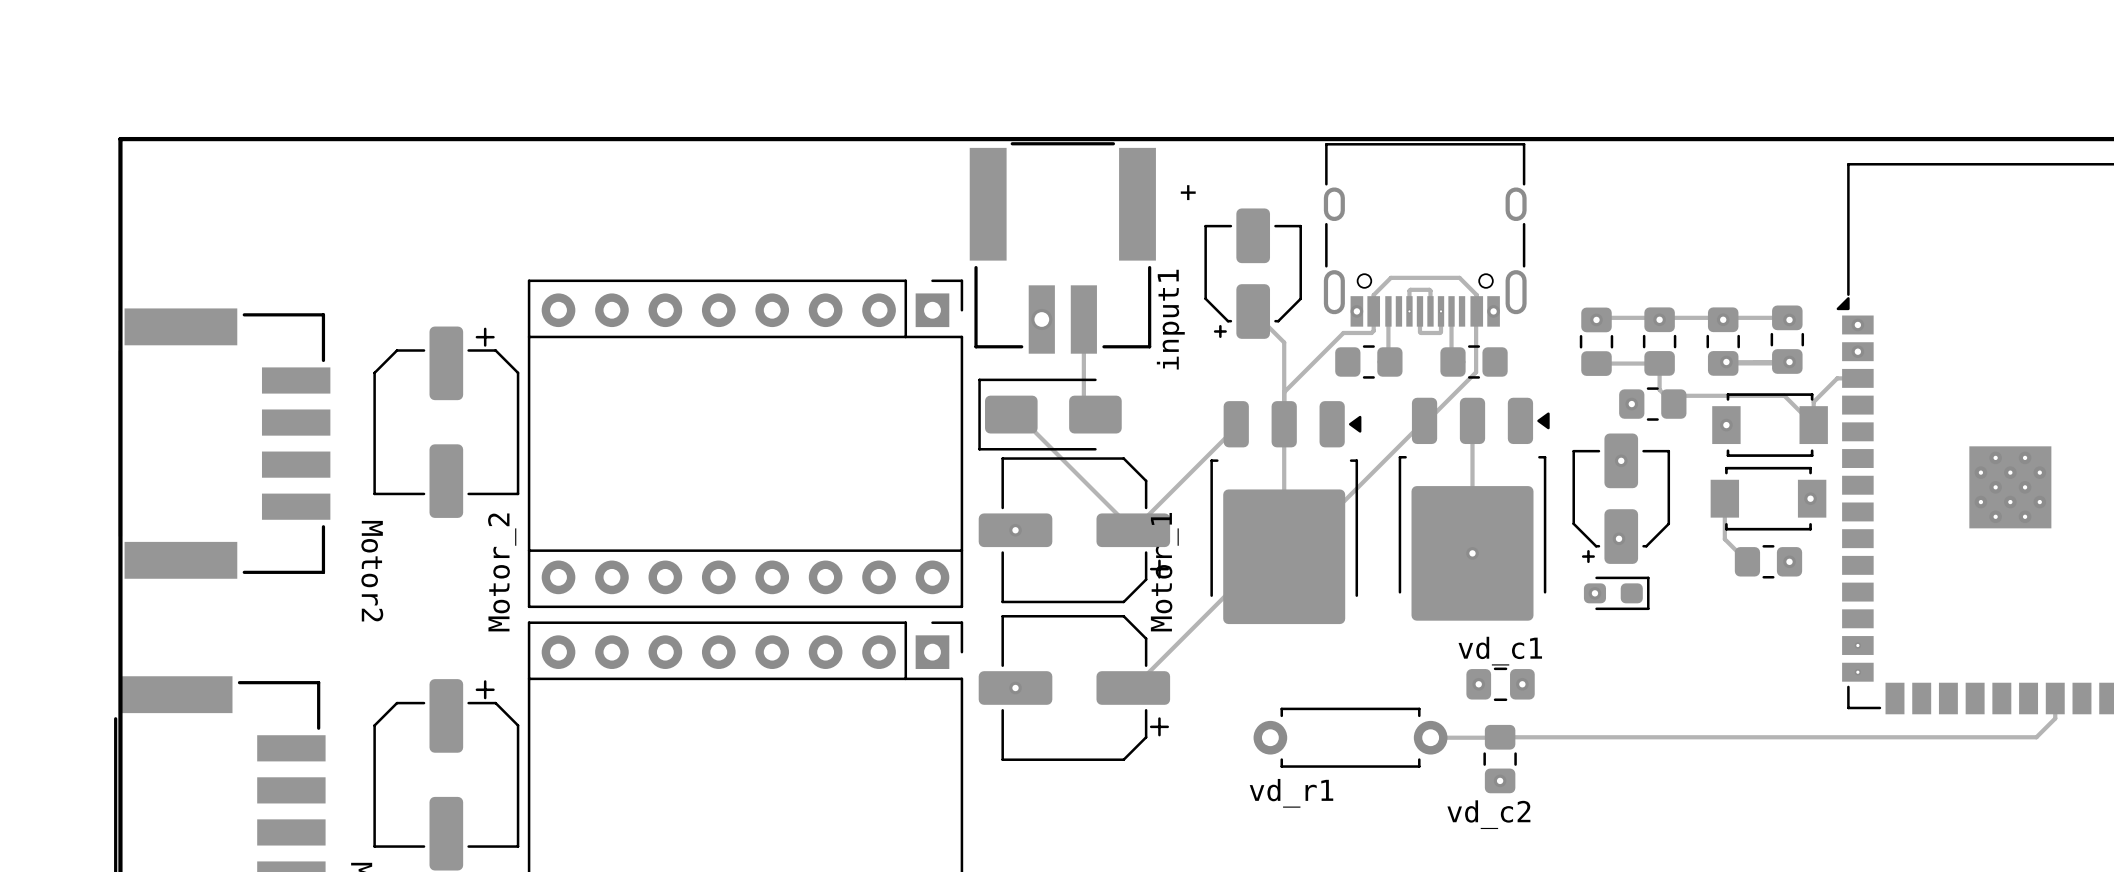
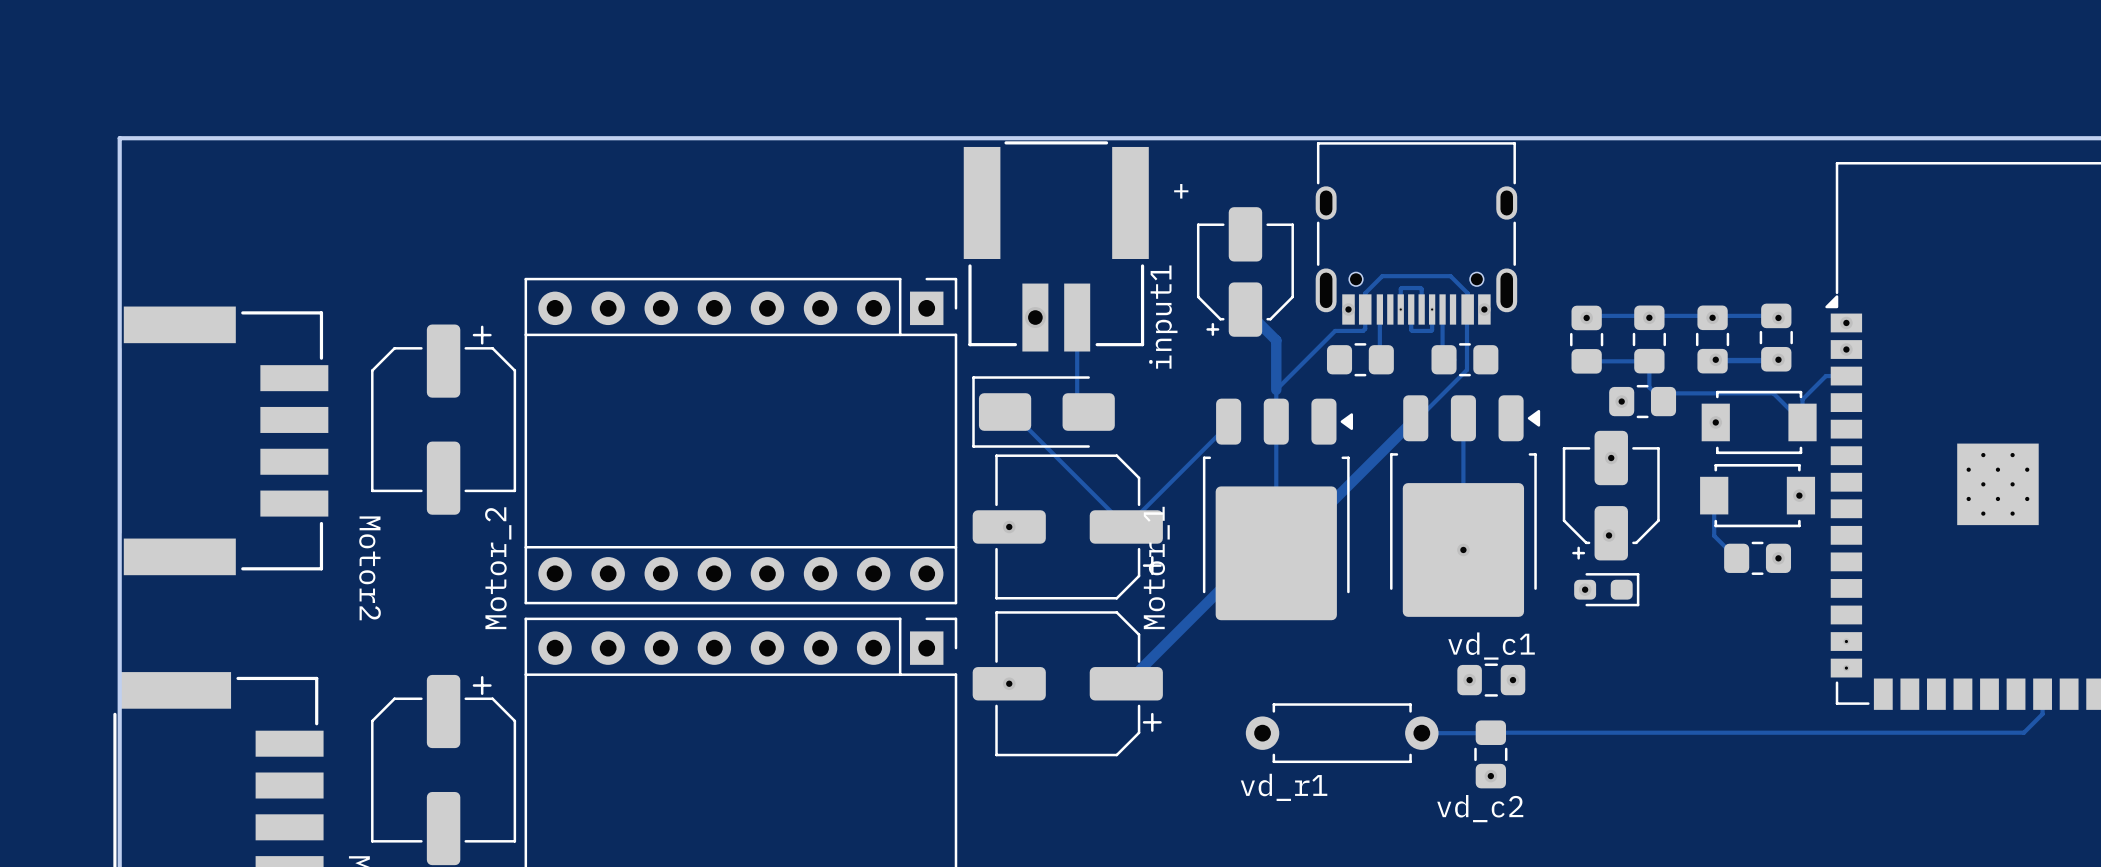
track width: thin (1253, 311) (1284, 342) (1284, 392) -> thick (1245, 309) (1276, 340) (1276, 389)
track width: thin (1424, 420) (1288, 556) -> thick (1415, 418) (1280, 553)
track width: thin (1264, 556) (1133, 687) -> thick (1256, 553) (1126, 683)

